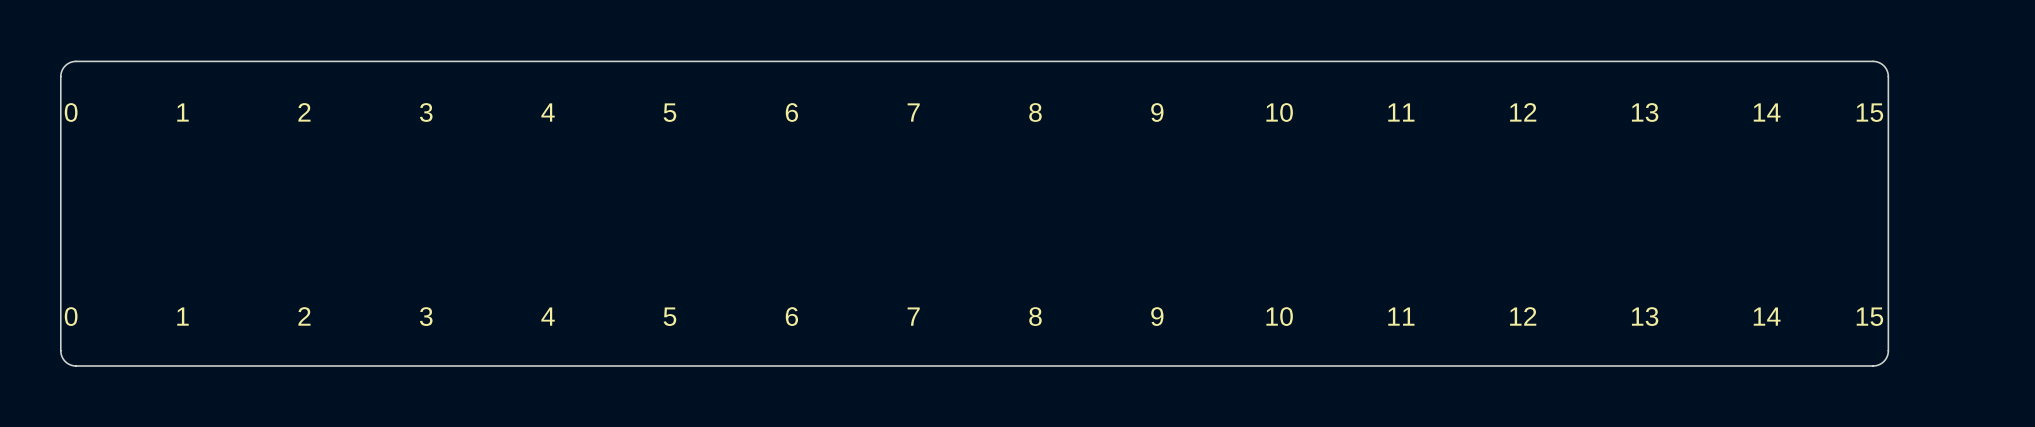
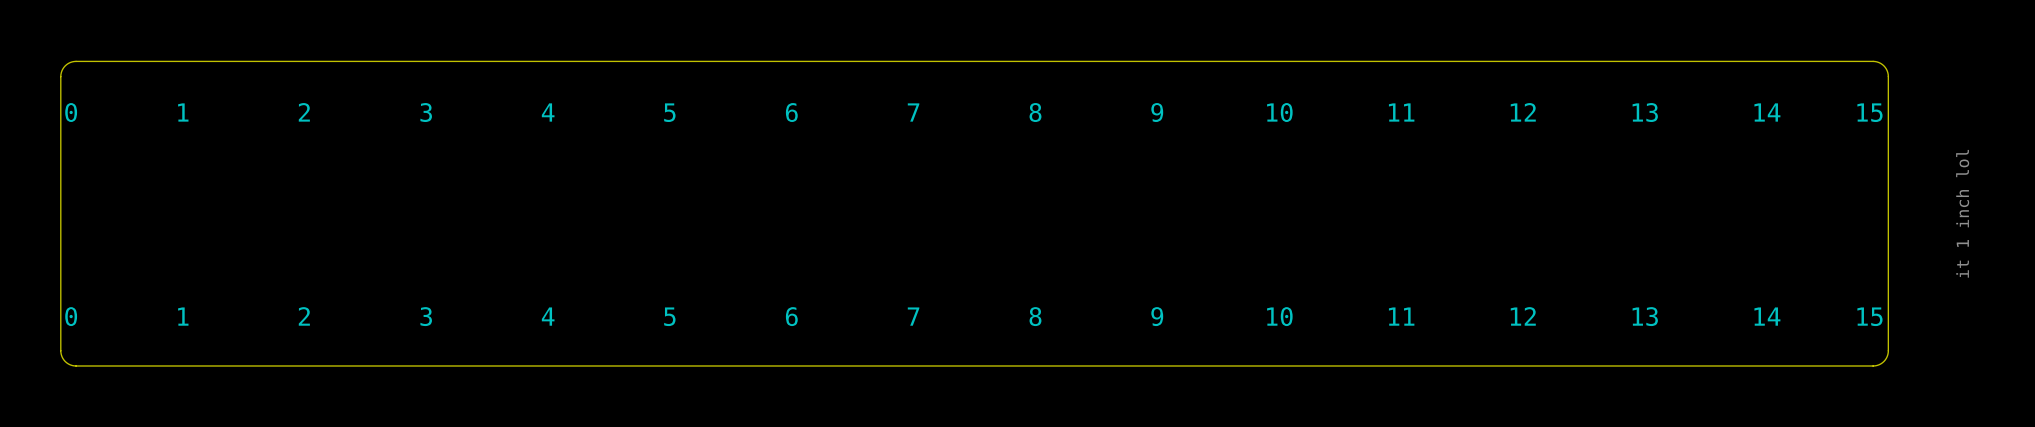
text: none -> it 1 inch lol (1962, 213)

